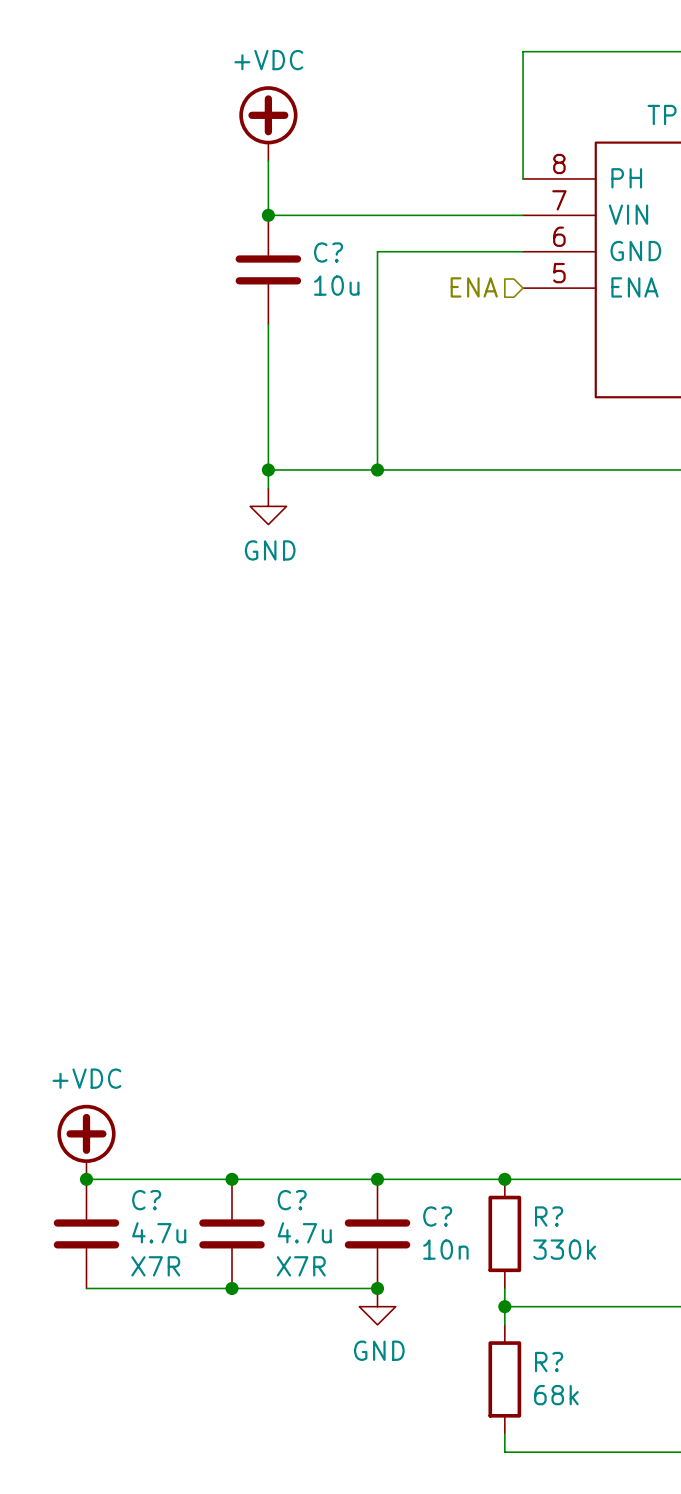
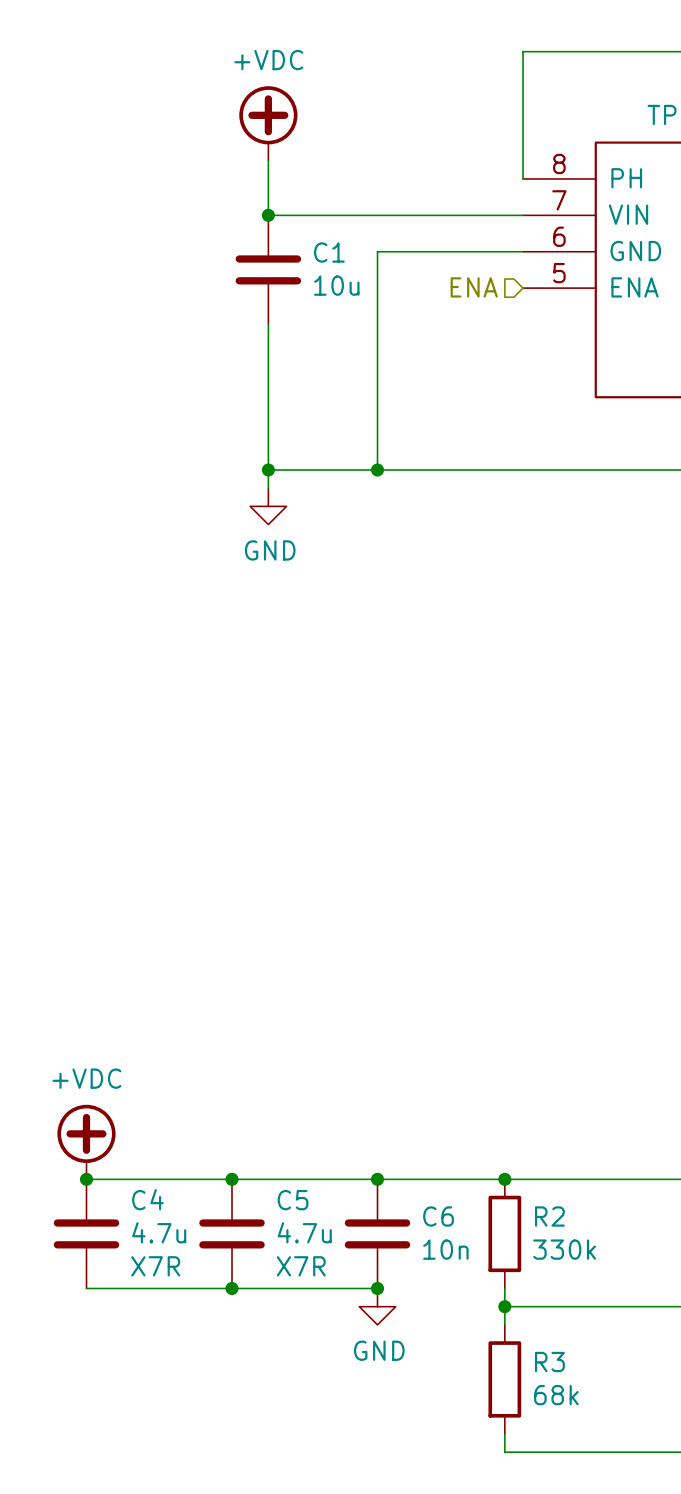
C? name: C? (328, 252) -> C1 (329, 252)
C? name: C? (146, 1200) -> C4 (147, 1199)
C? name: C? (292, 1200) -> C5 (293, 1200)
C? name: C? (437, 1216) -> C6 (438, 1216)
R? name: R? (549, 1216) -> R2 (549, 1216)
R? name: R? (549, 1362) -> R3 (549, 1362)

